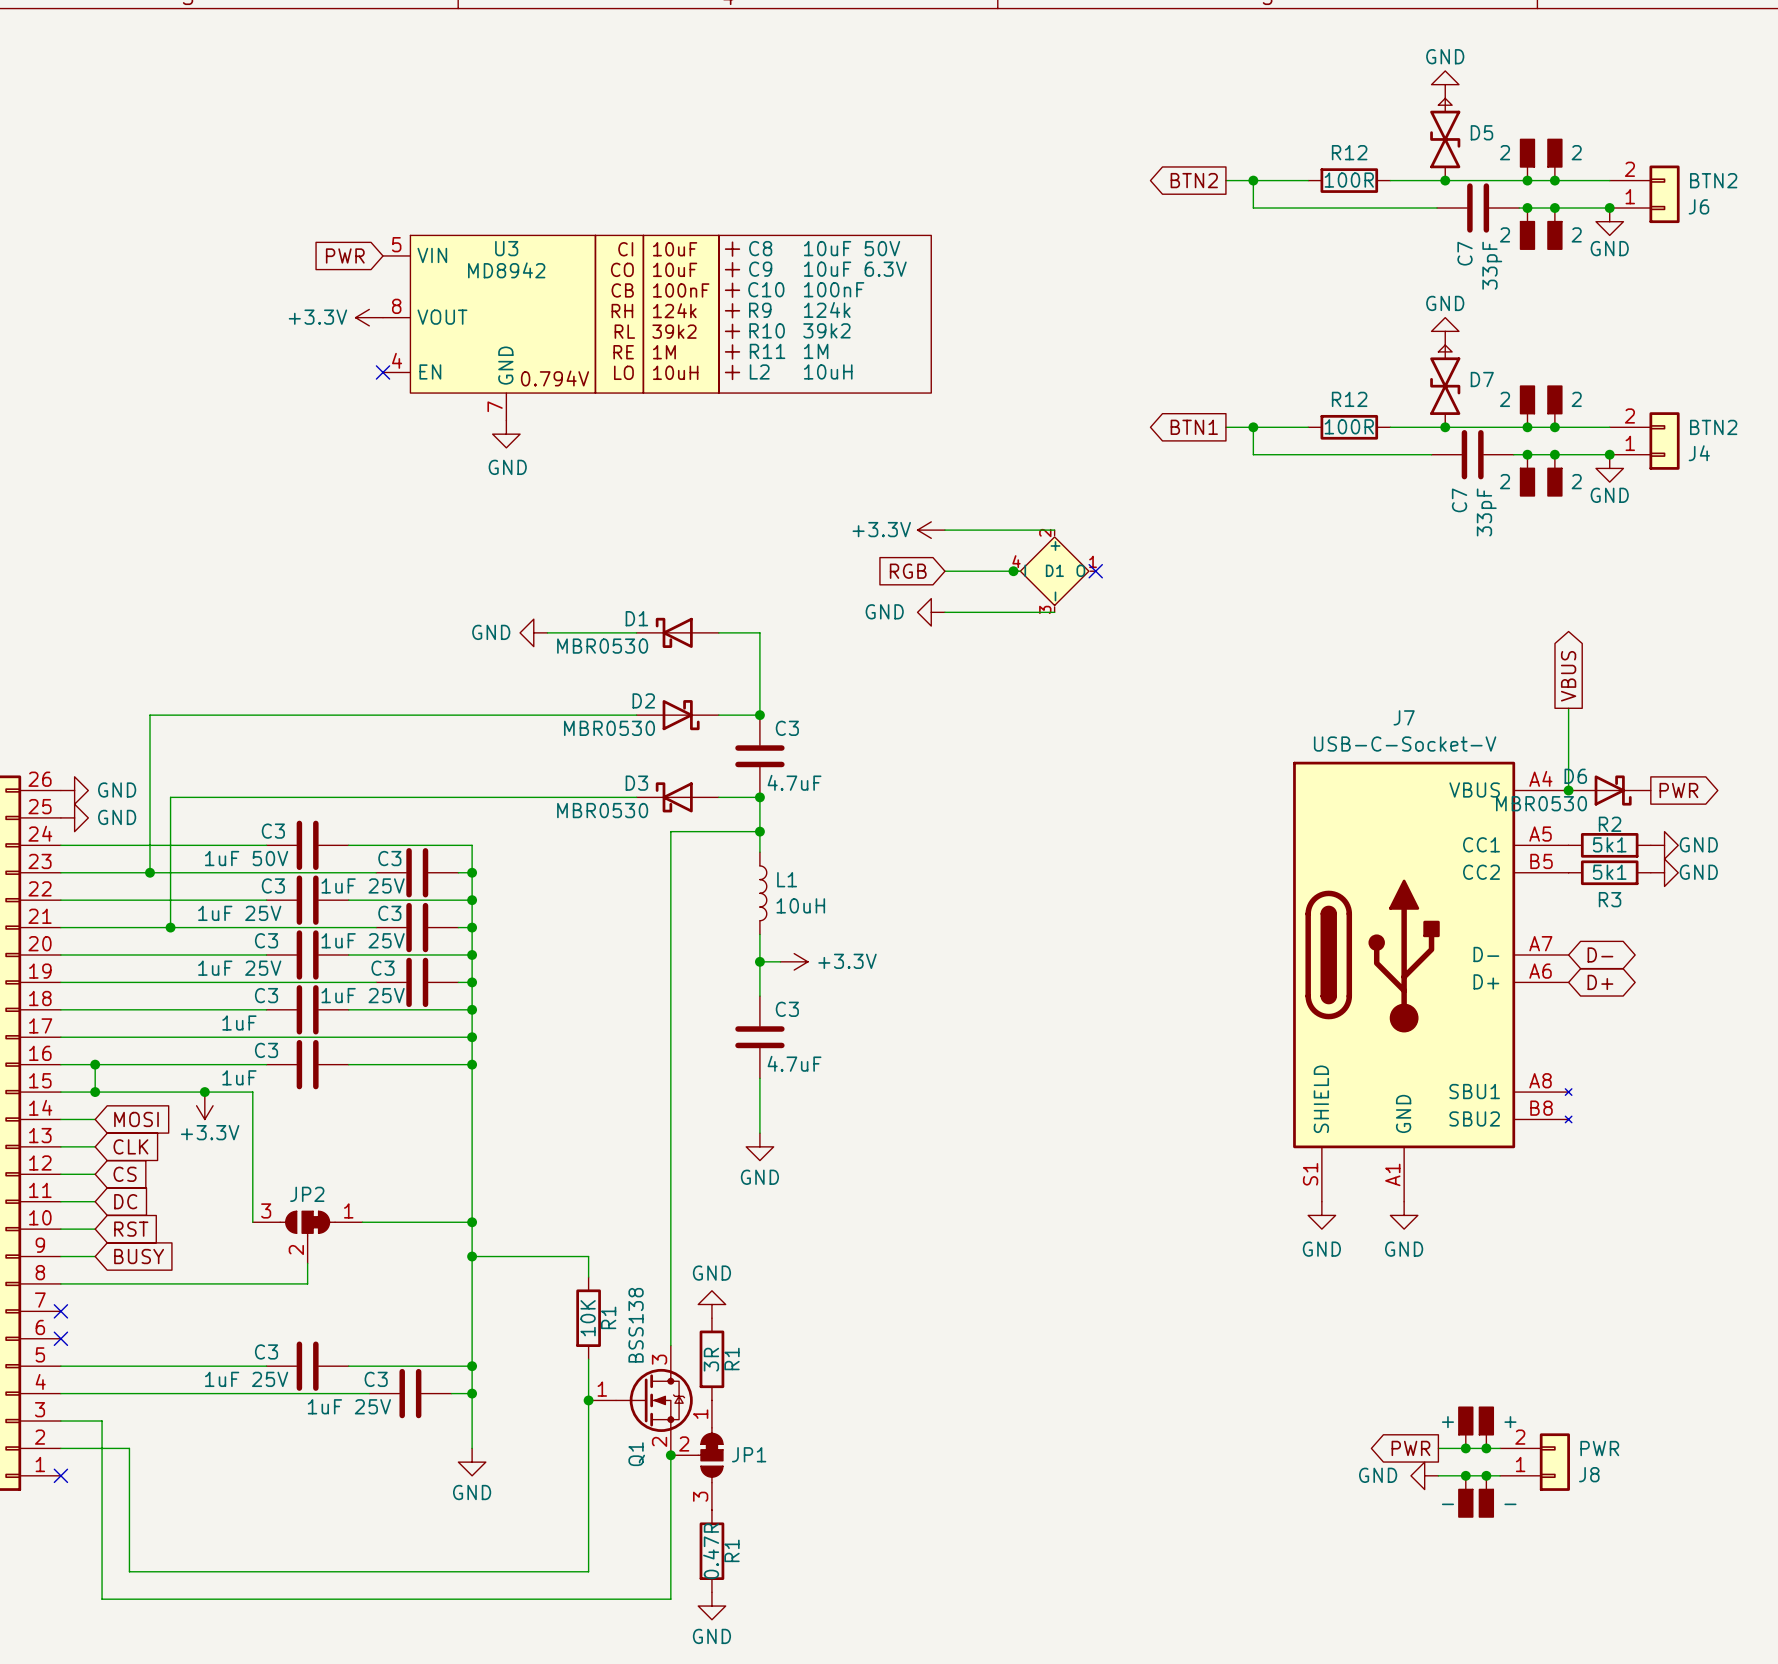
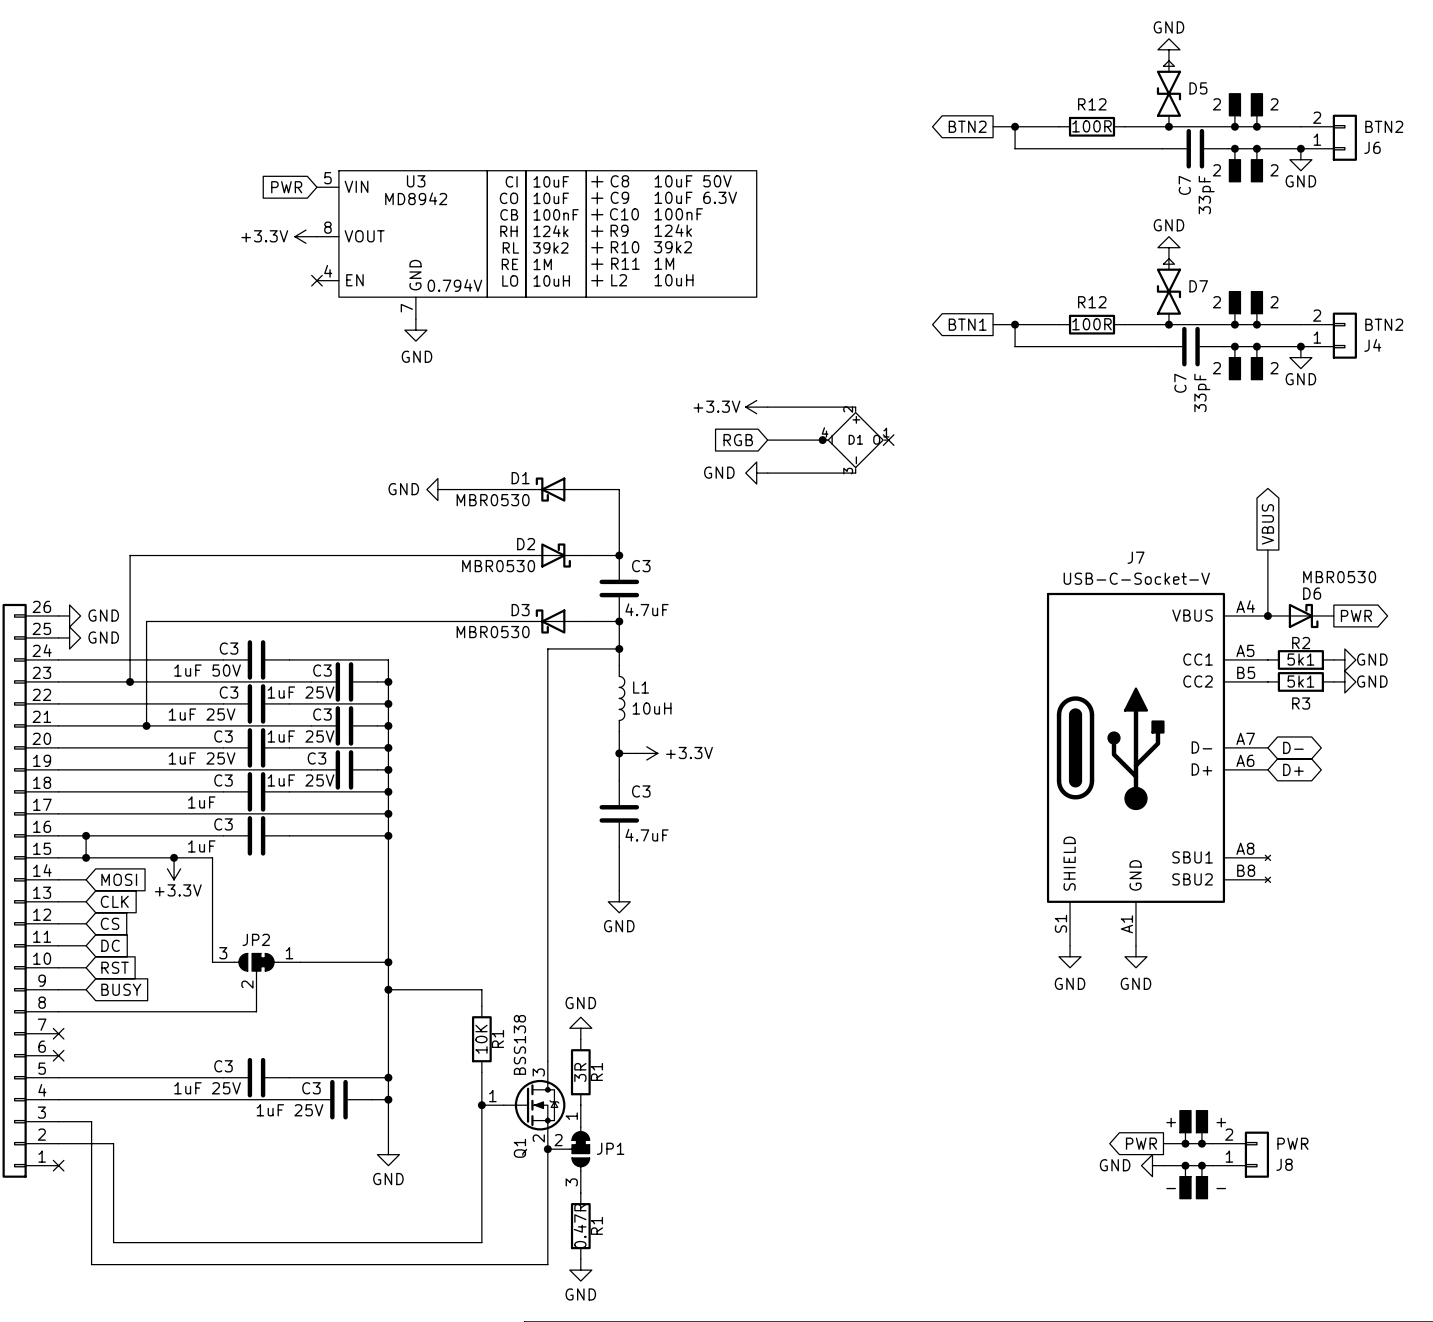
D6 name position: D6 (1575, 776) -> D6 (1312, 593)
D6 value position: MBR0530 (1541, 803) -> MBR0530 (1339, 577)

